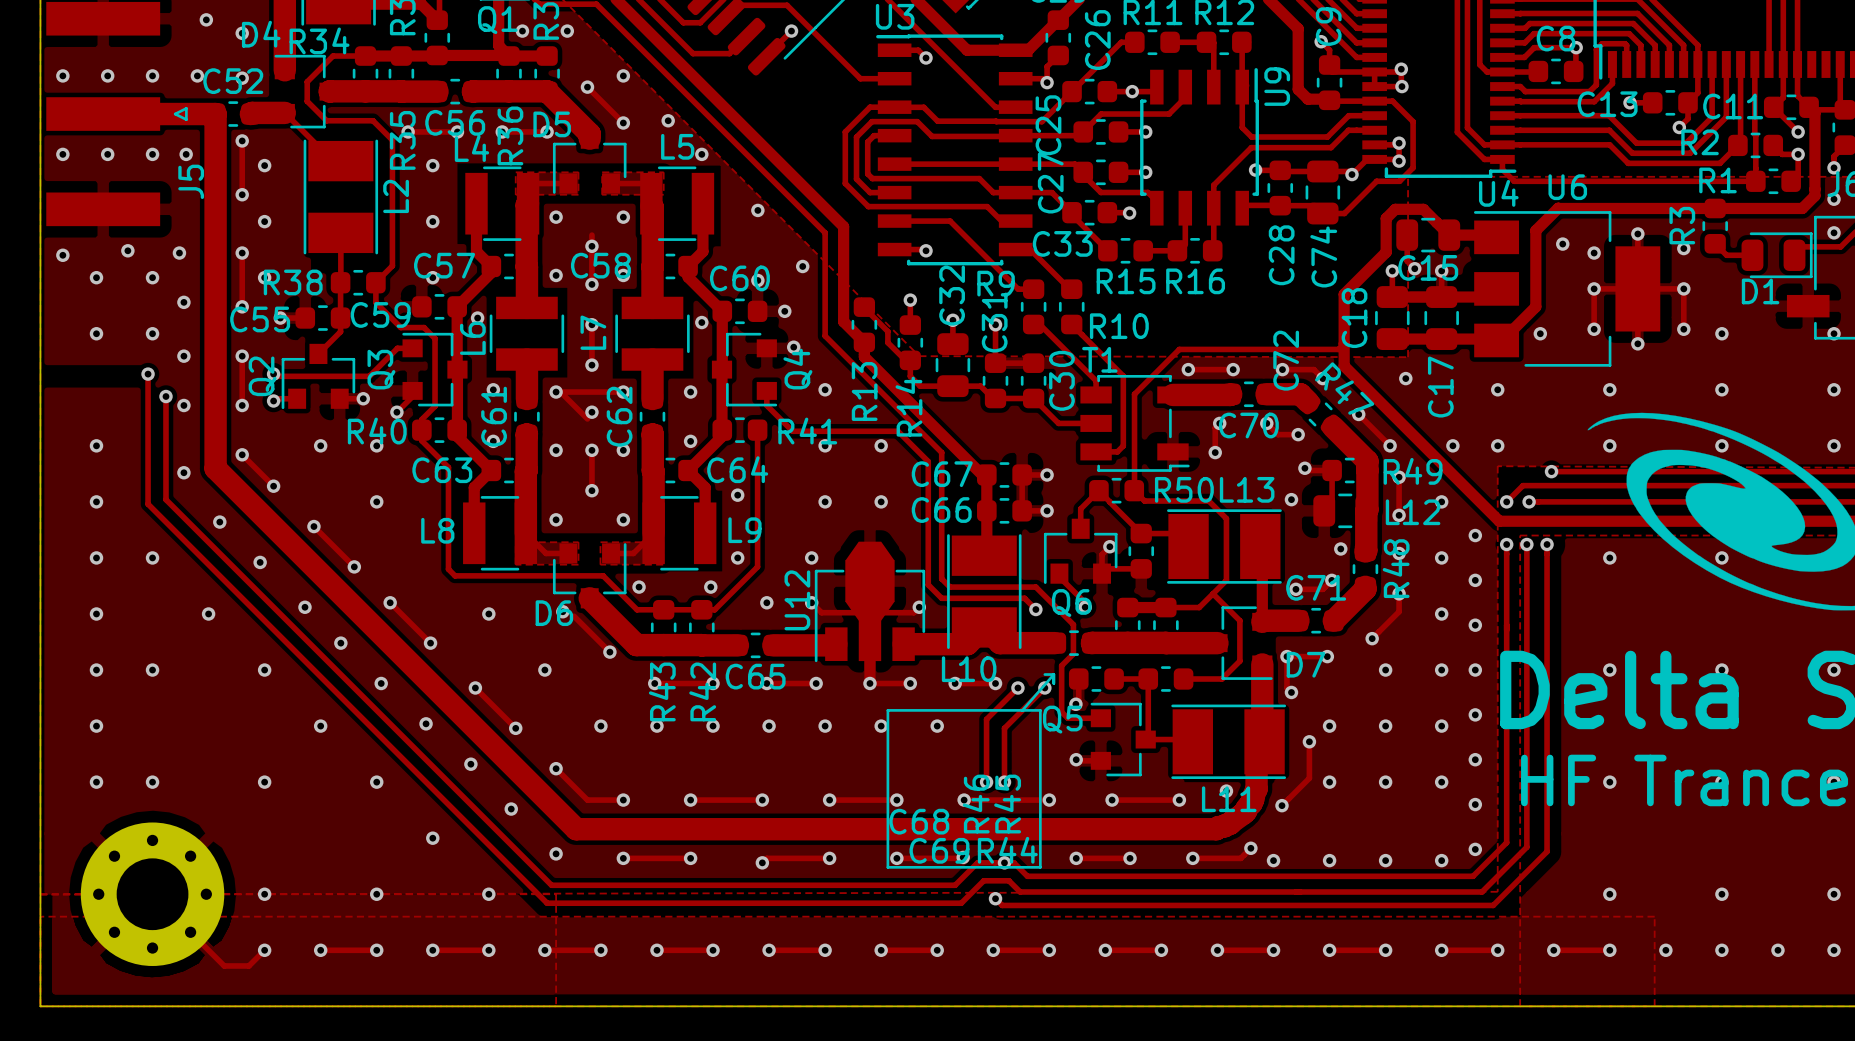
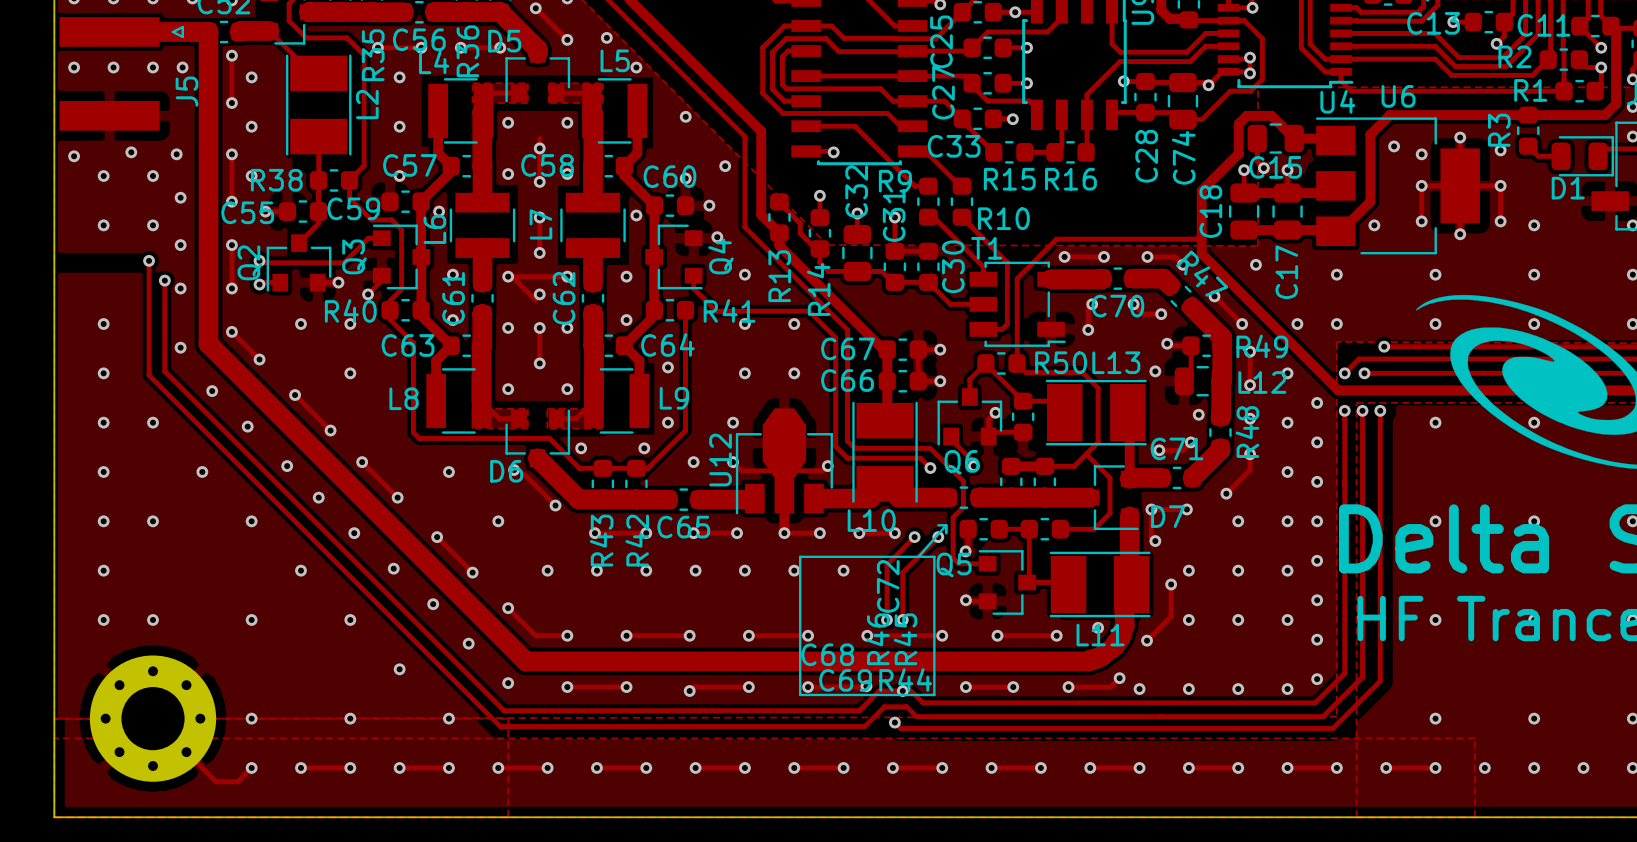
C72 name position: C72 (1286, 360) -> C72 (888, 586)

